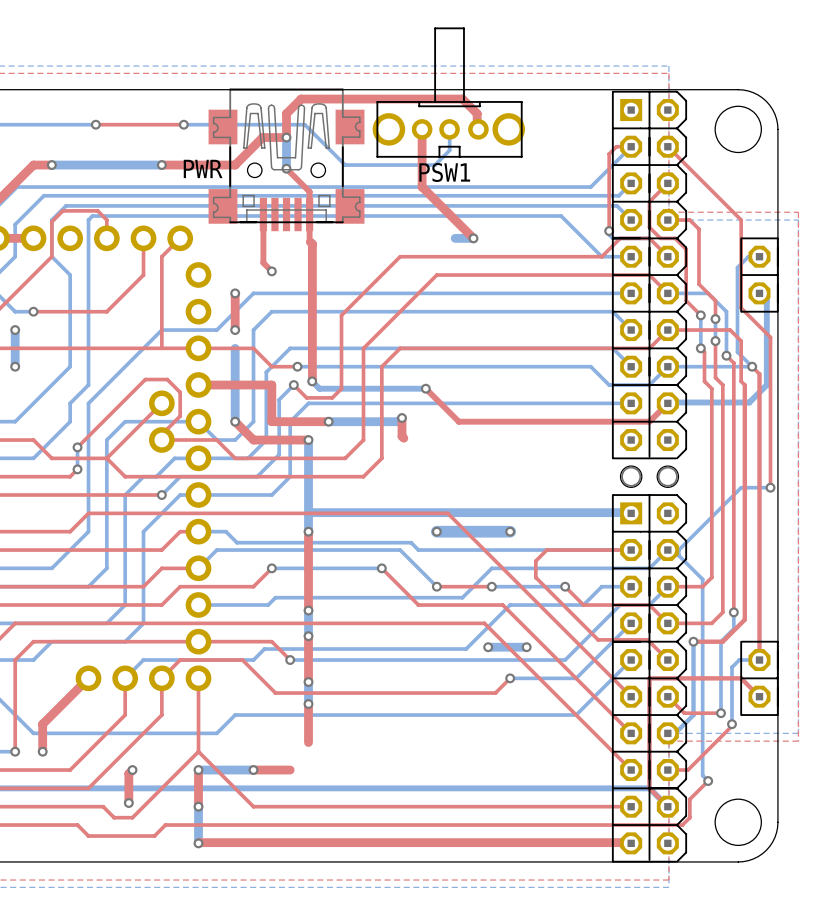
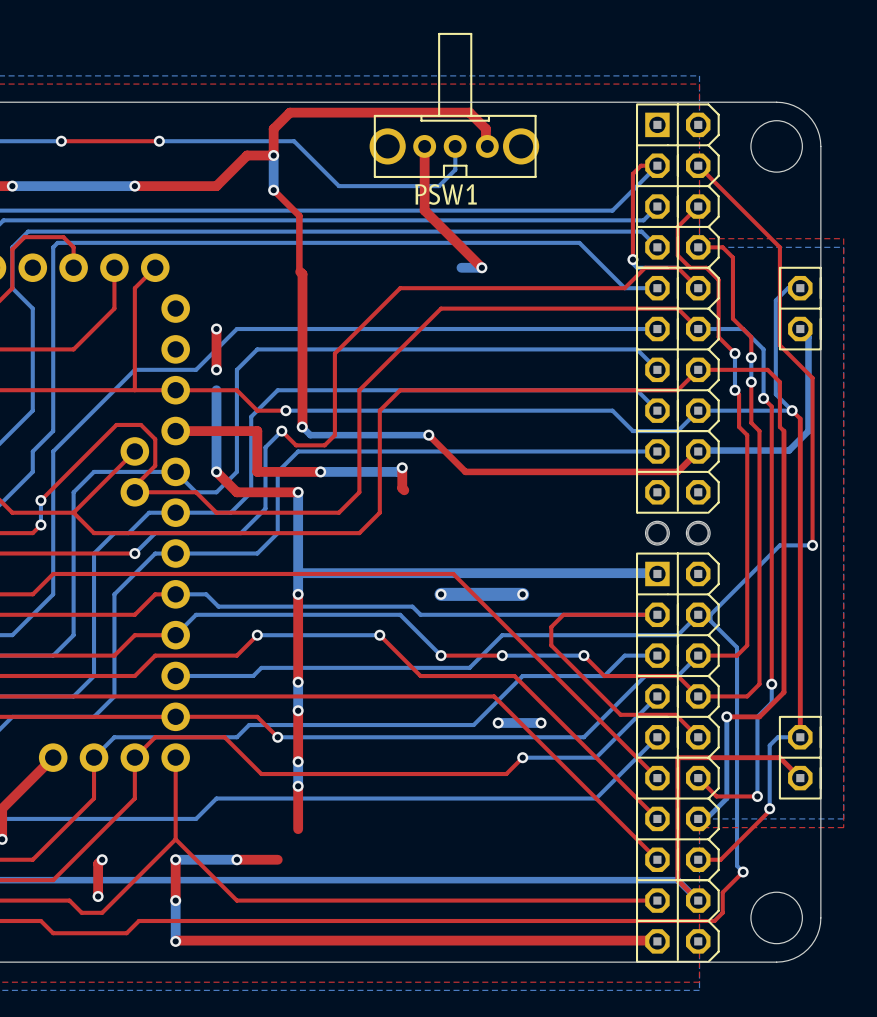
PWR: (286, 159) -> none
top track: (263, 214) (263, 262) (271, 271) -> none
via: (271, 271) -> none

